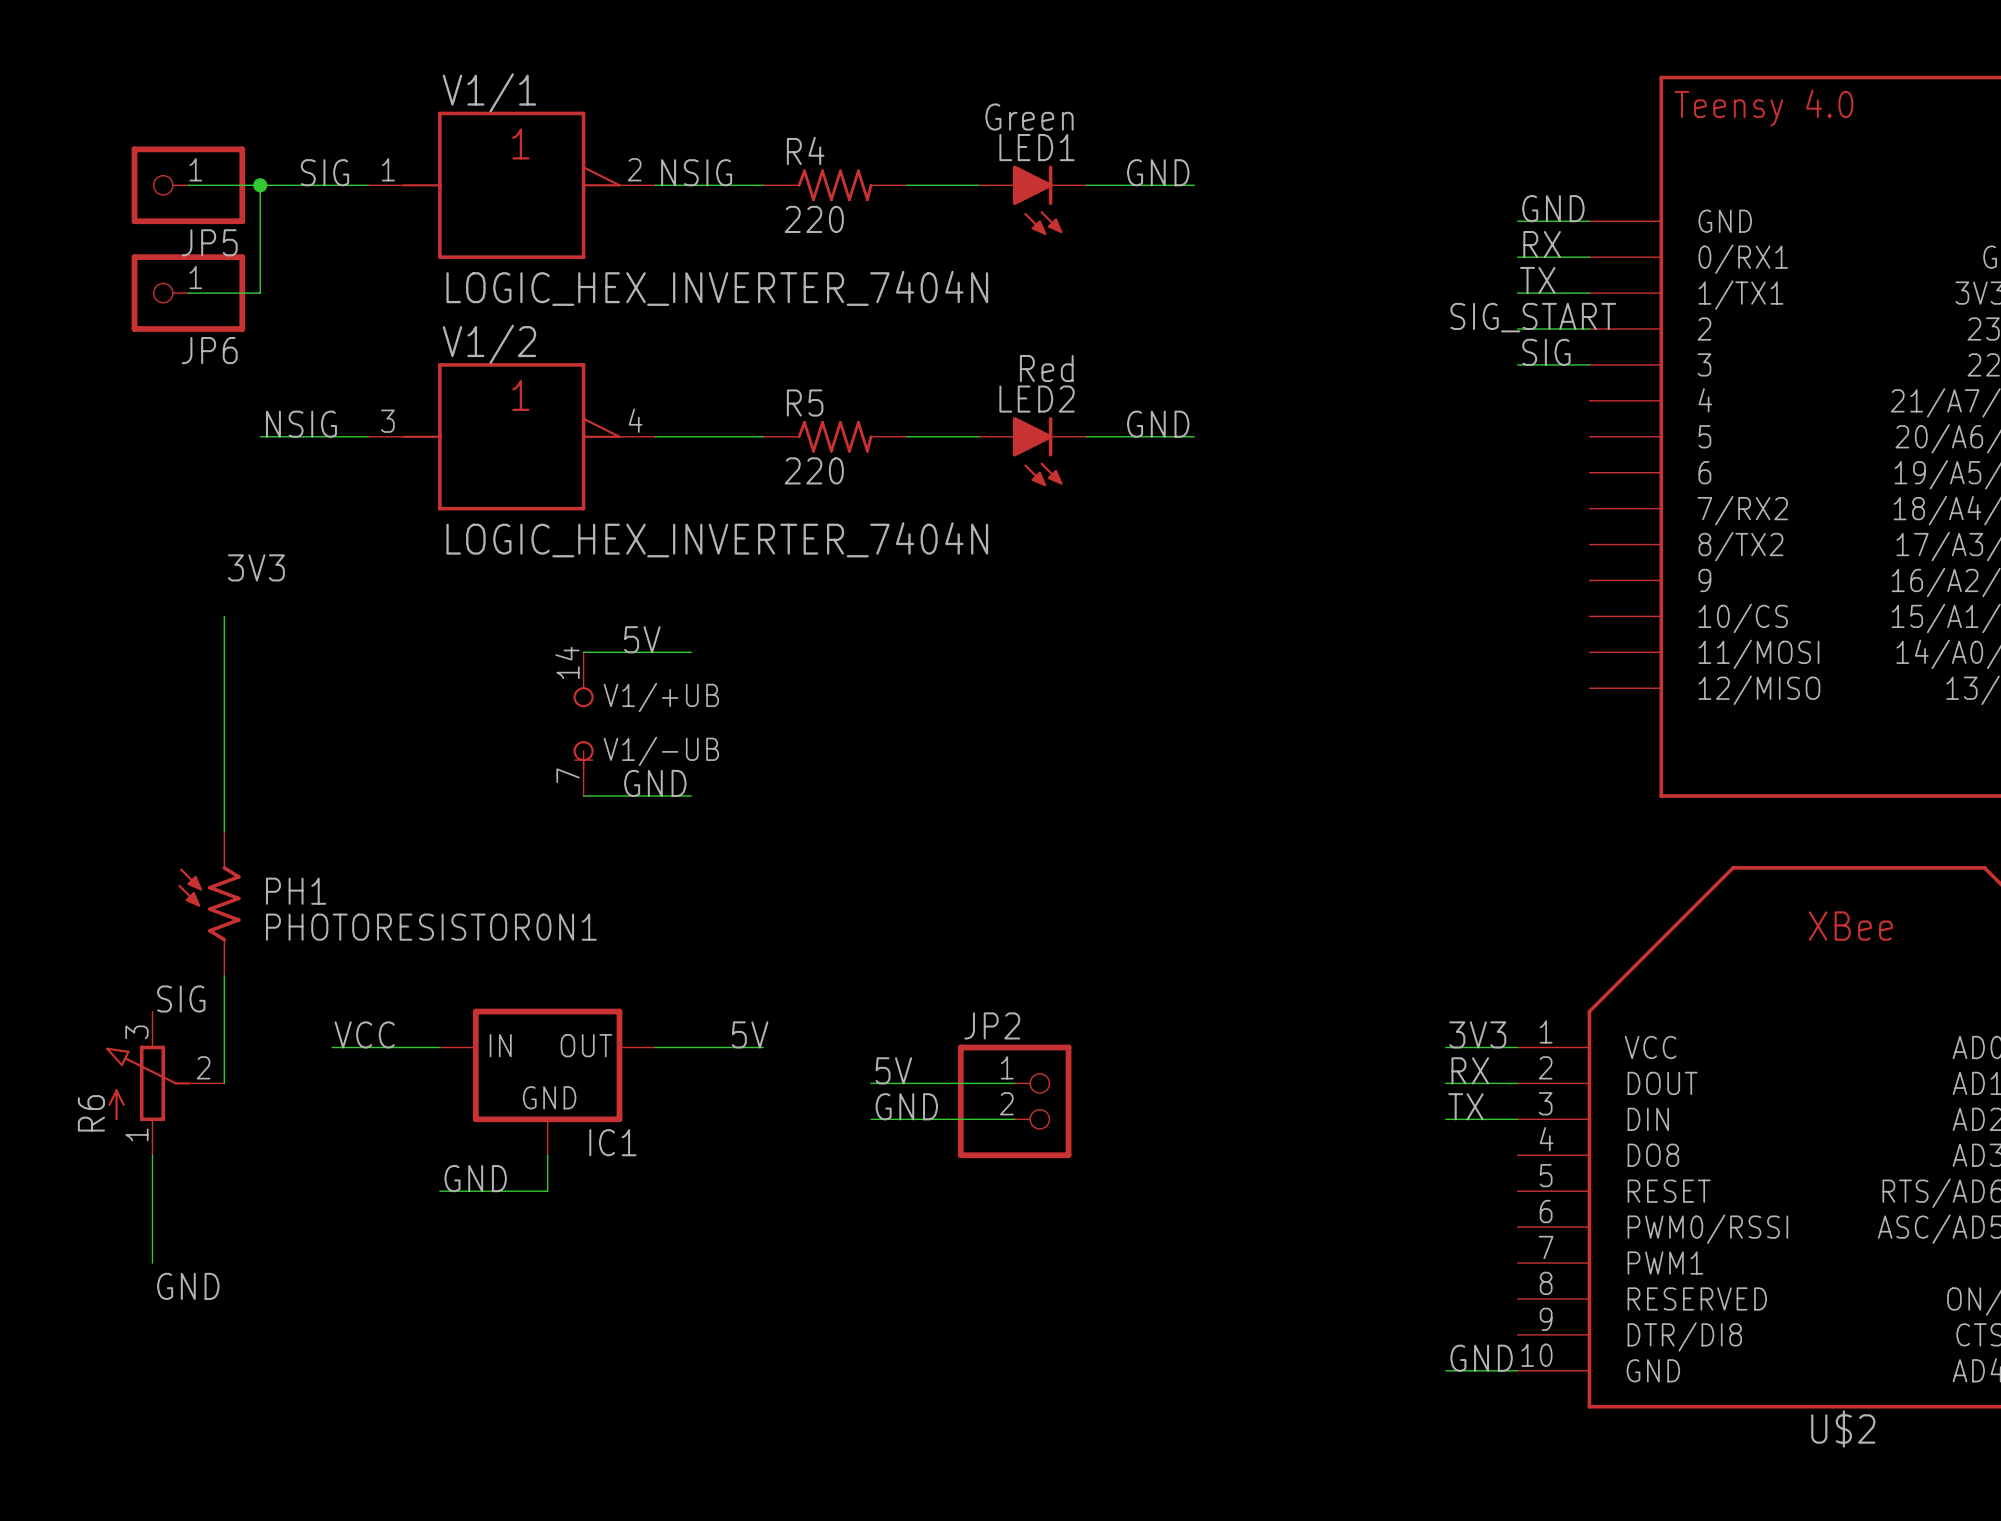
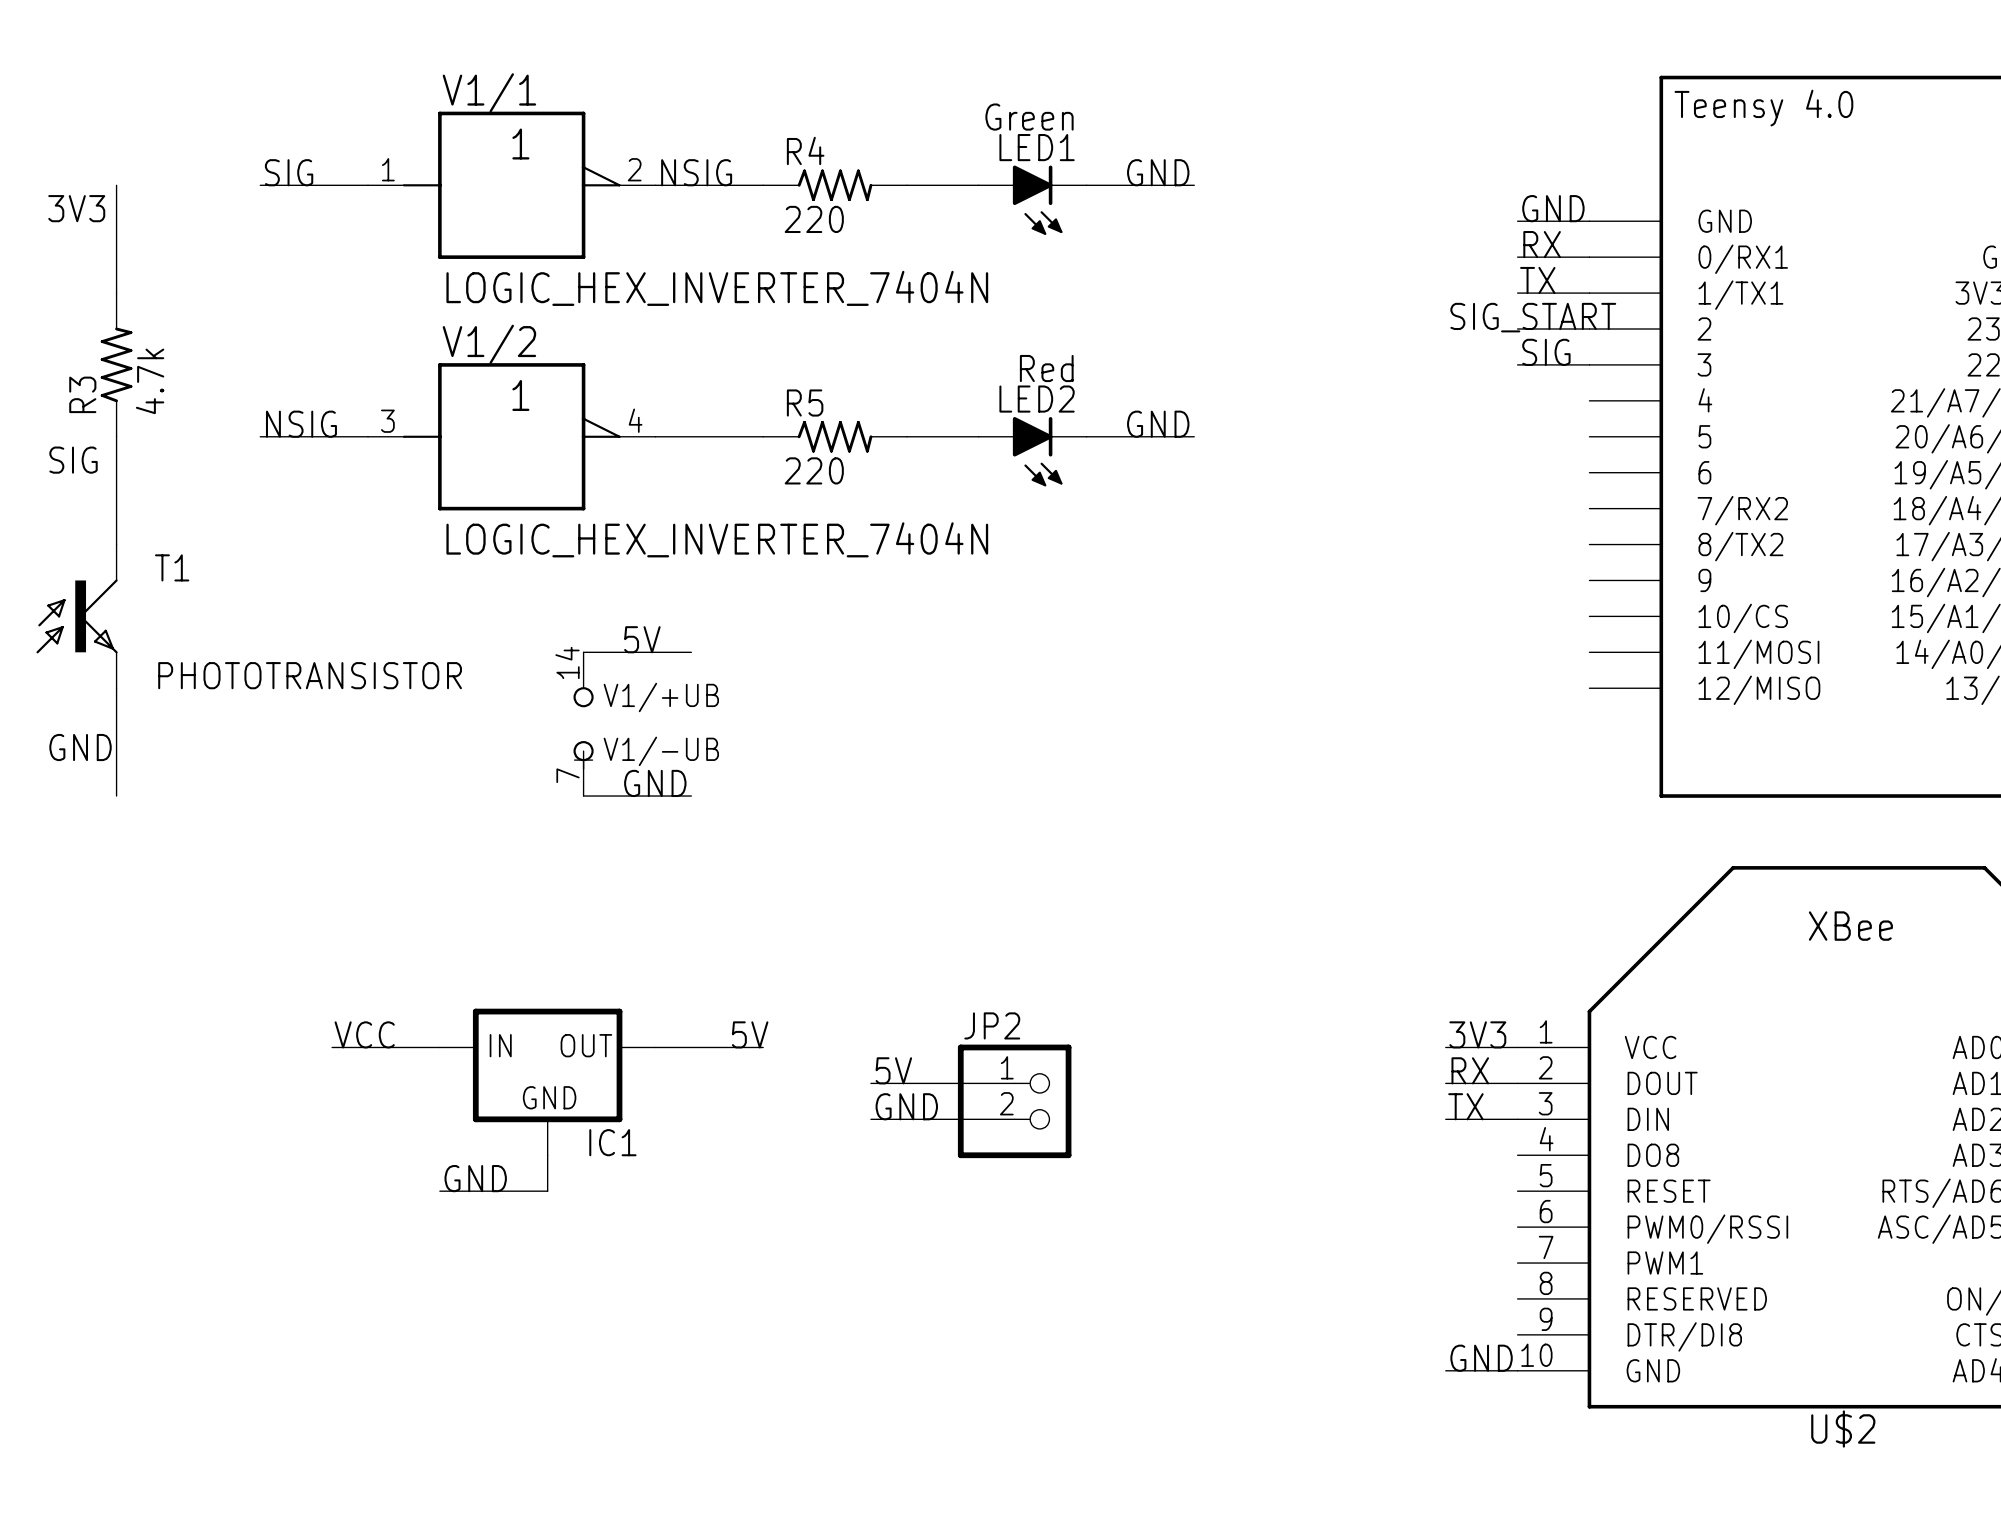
label position: SIG (324, 172) -> SIG (289, 172)
wire: none -> (116, 185) (116, 293)
wire: (188, 185) (260, 185) (260, 293) (188, 293) -> none
JP5: (188, 185) -> none
junction: (260, 185) -> none
label: none -> 3V3 (76, 208)
JP6: (188, 293) -> none
R3: none -> 4.7k (116, 364)
wire: none -> (116, 436) (116, 544)
label: none -> SIG (73, 460)
label: 3V3 (256, 567) -> none
T1: none -> PHOTOTRANSISTOR (77, 616)
wire: (224, 616) (224, 831) -> none
label: none -> GND (80, 747)
PH1: PHOTORESISTOR0N1 (209, 903) -> none
wire: (224, 975) (224, 1083) -> (116, 688) (116, 796)
label: SIG (181, 998) -> none
R6: (165, 1083) -> none
wire: (152, 1155) (152, 1263) -> none
label: GND (188, 1286) -> none

